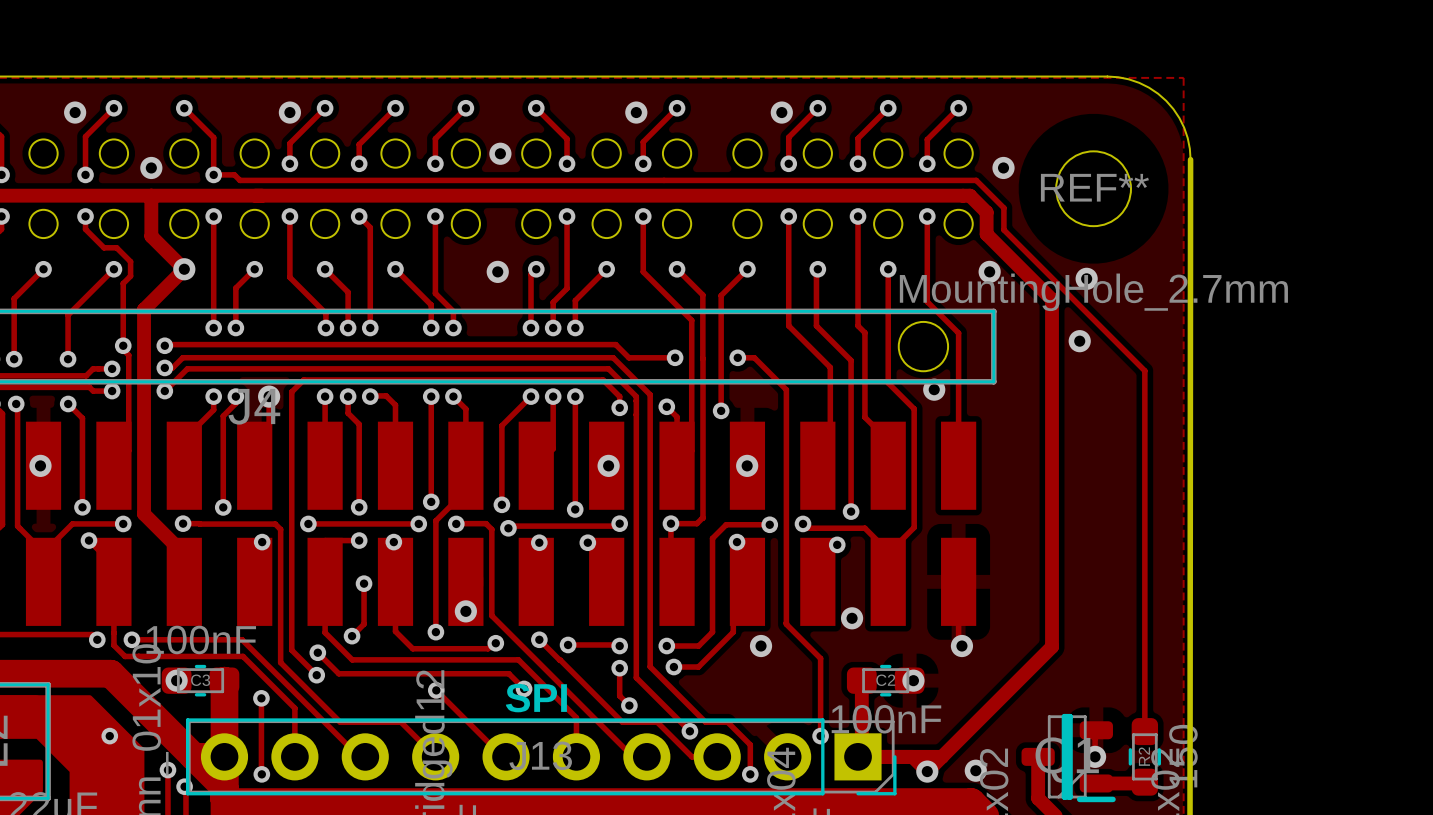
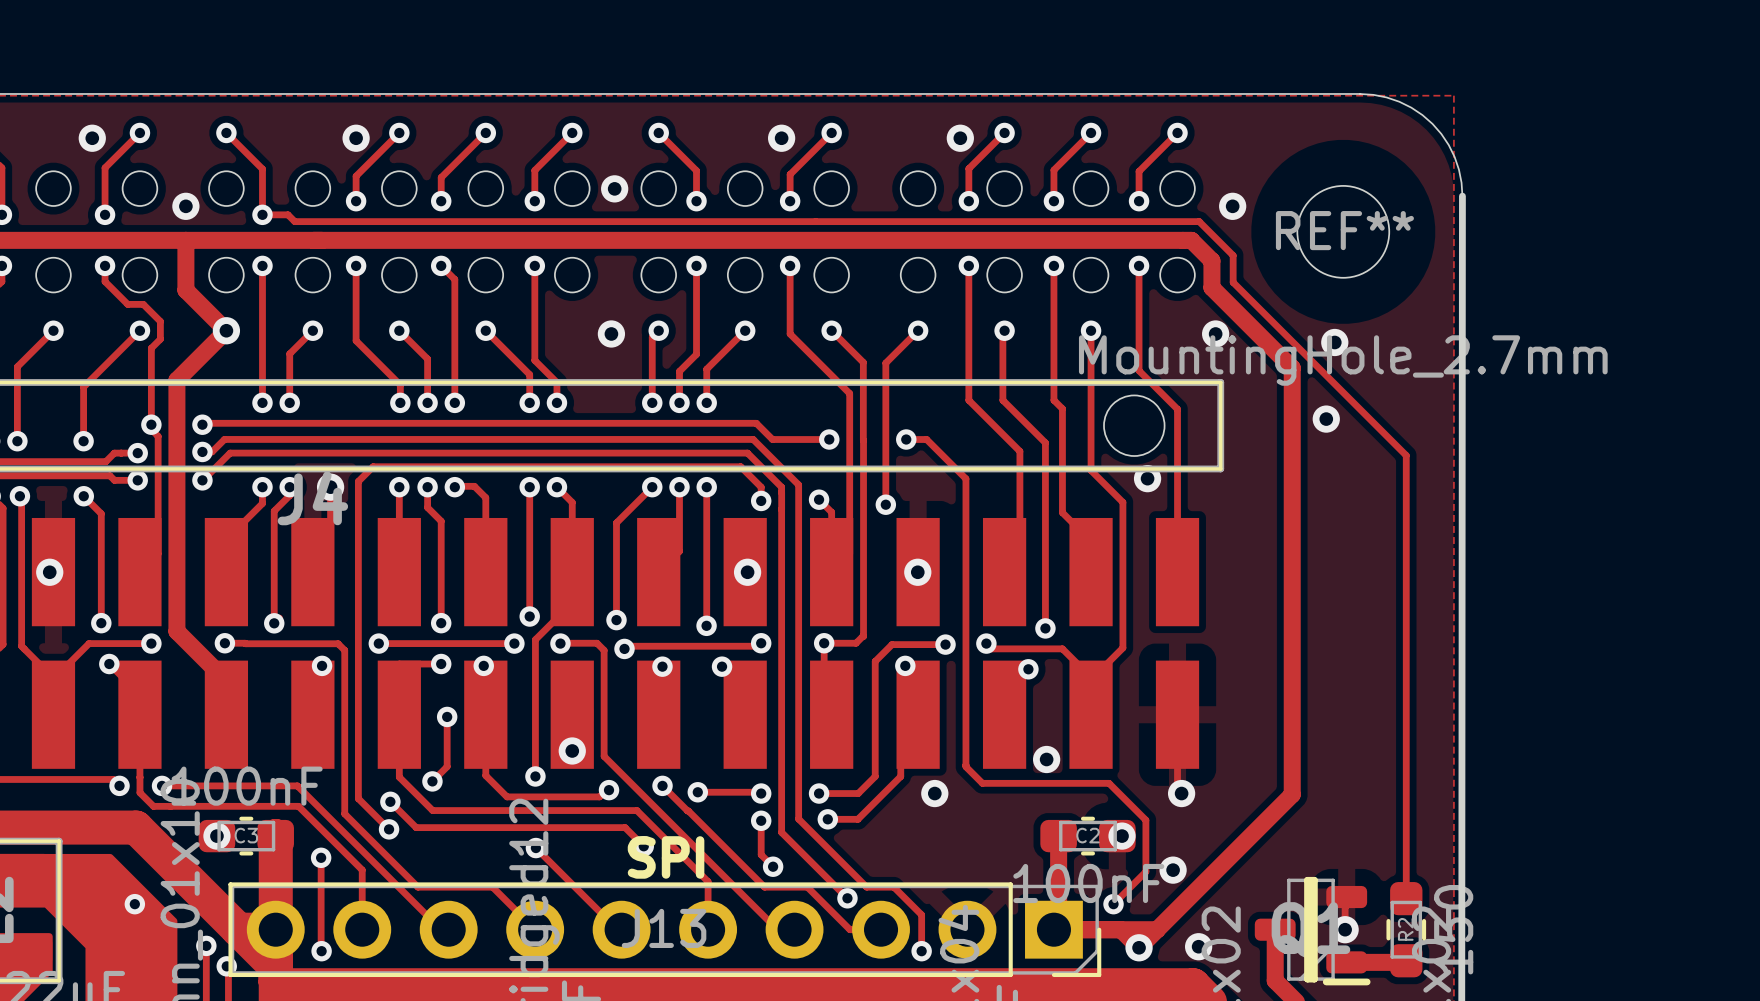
track: (799, 637) (820, 658) (820, 736) -> (982, 783) (1109, 783) (1145, 820) (1145, 871) (1113, 904)
via: none -> (1173, 870)
via: (820, 736) -> none
via: none -> (1113, 904)

